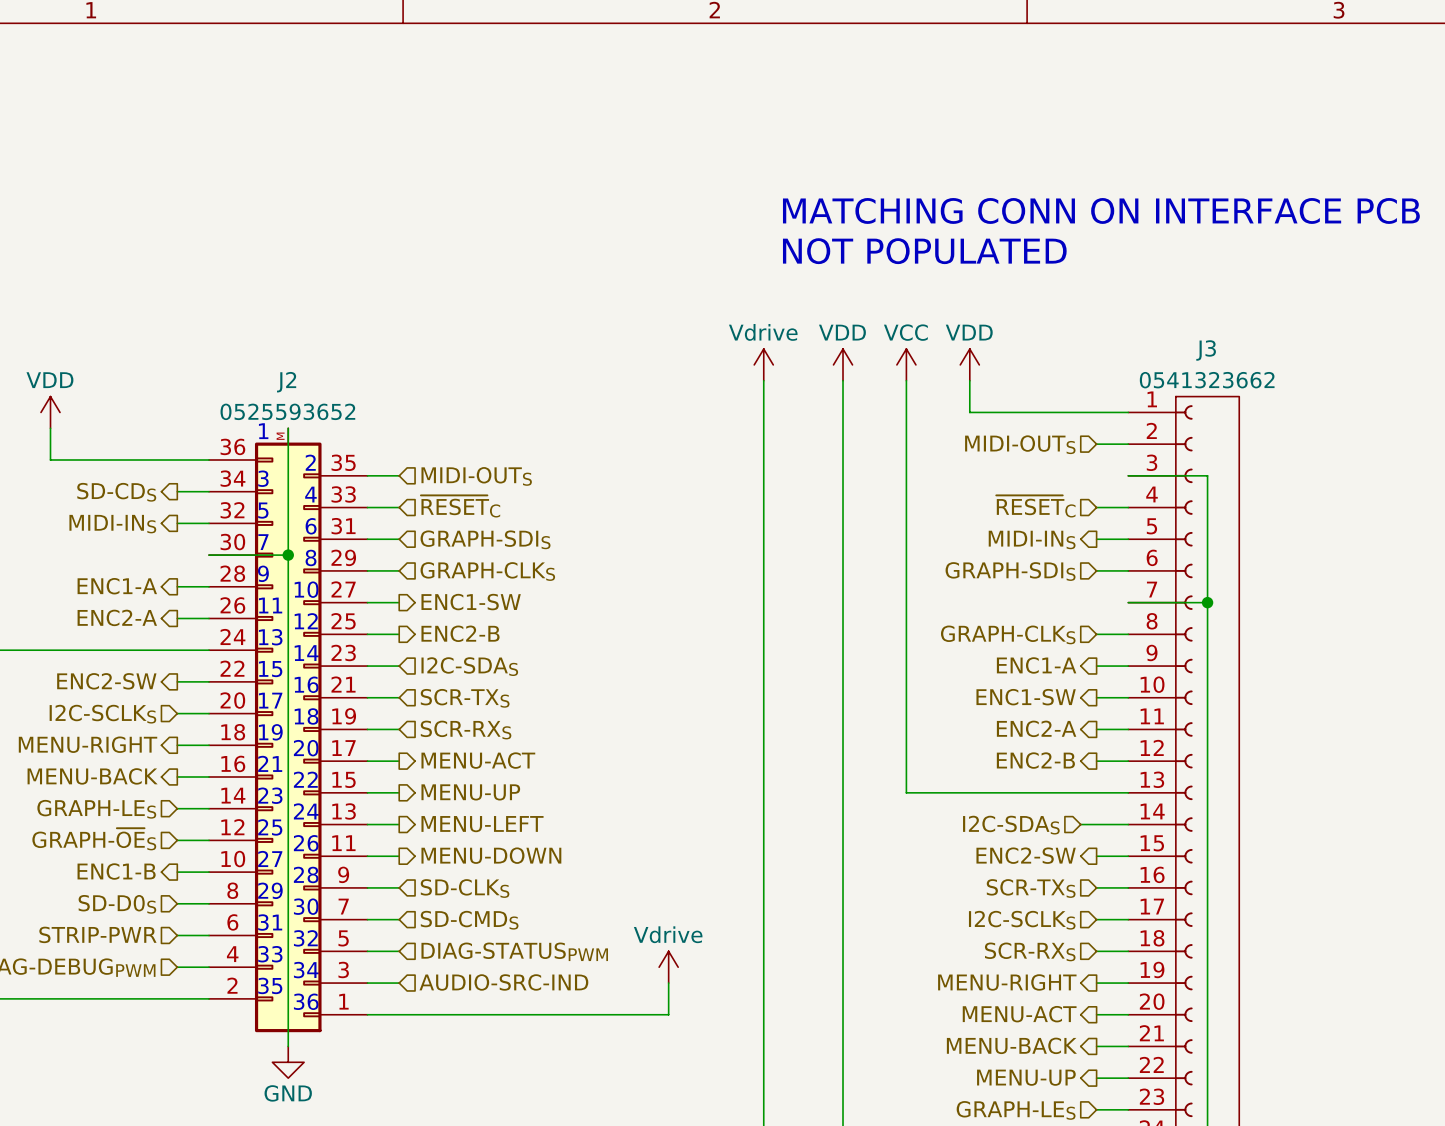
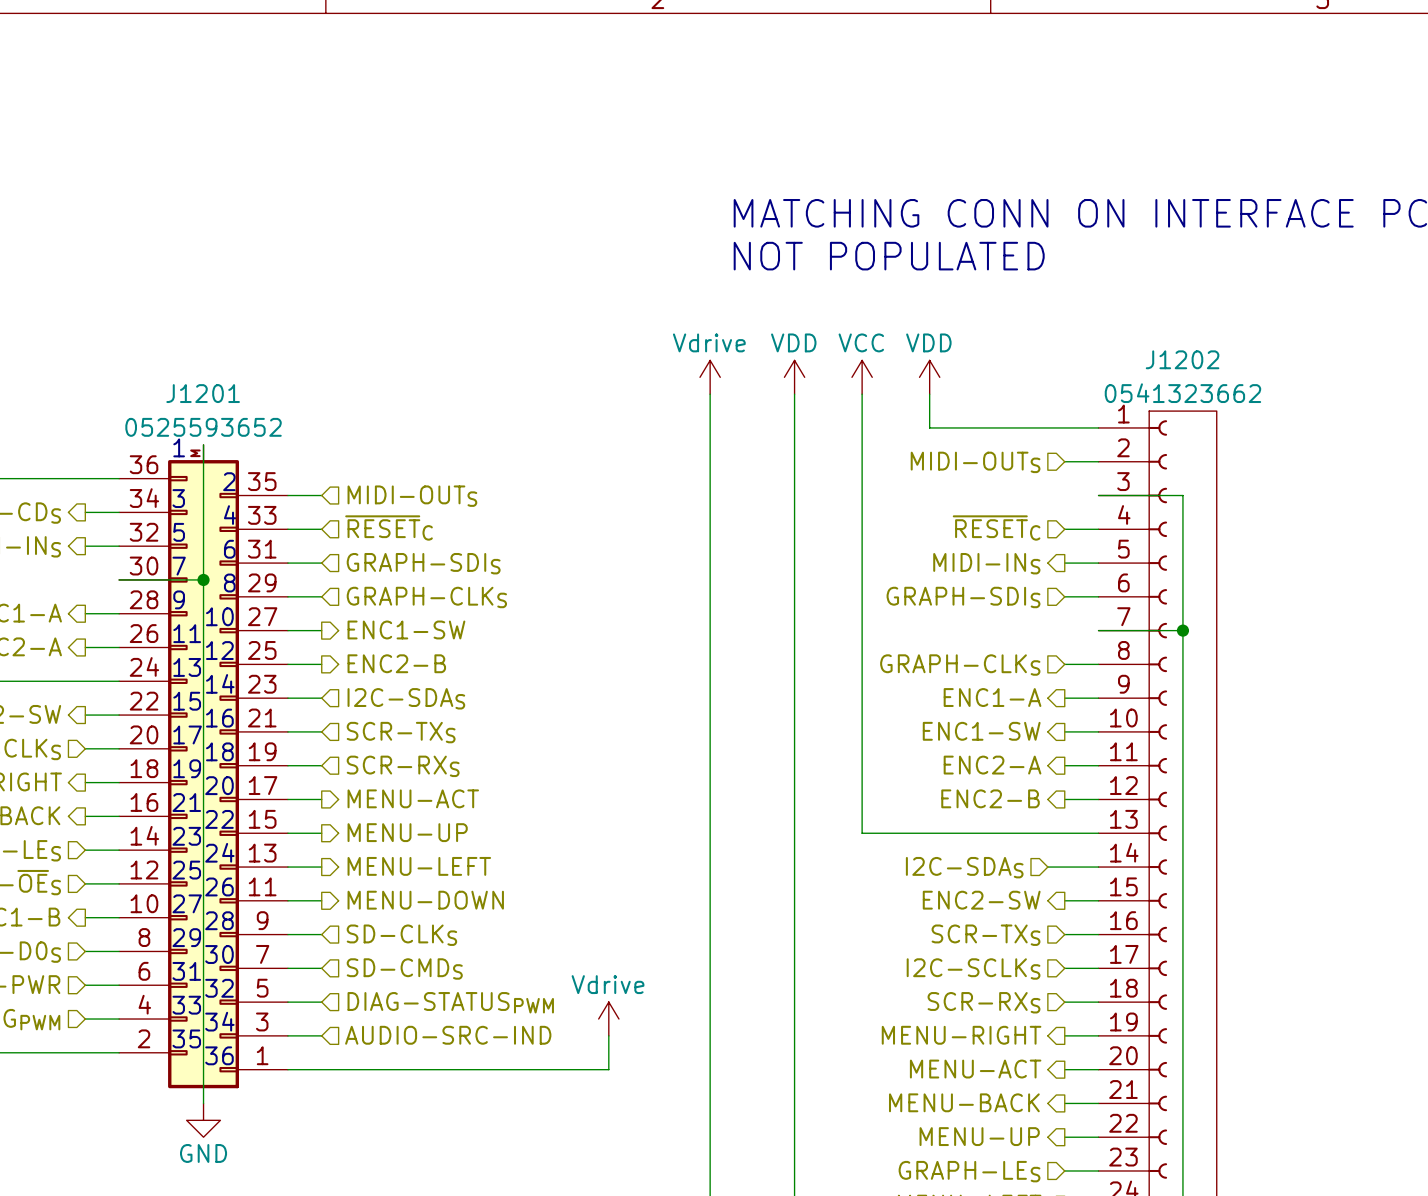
J3 name: J3 (1206, 350) -> J1202 (1182, 359)
J2 name: J2 (286, 382) -> J1201 (203, 393)

